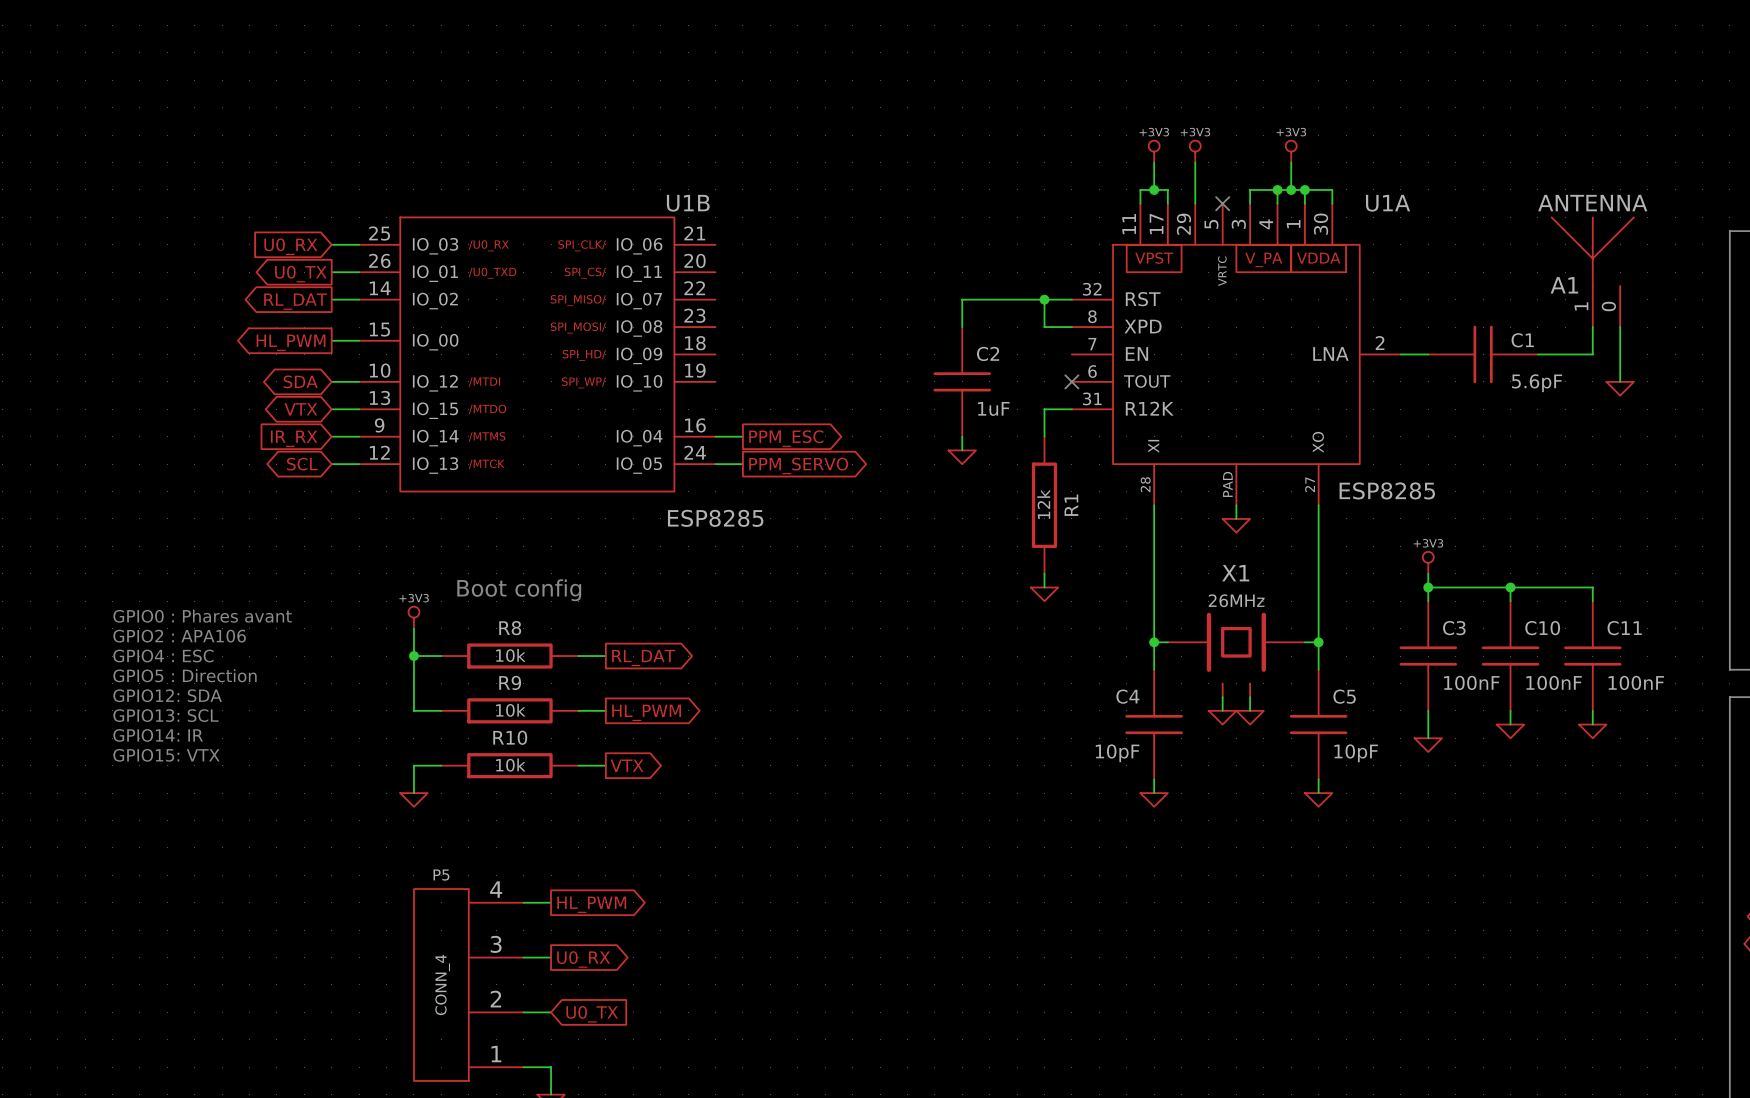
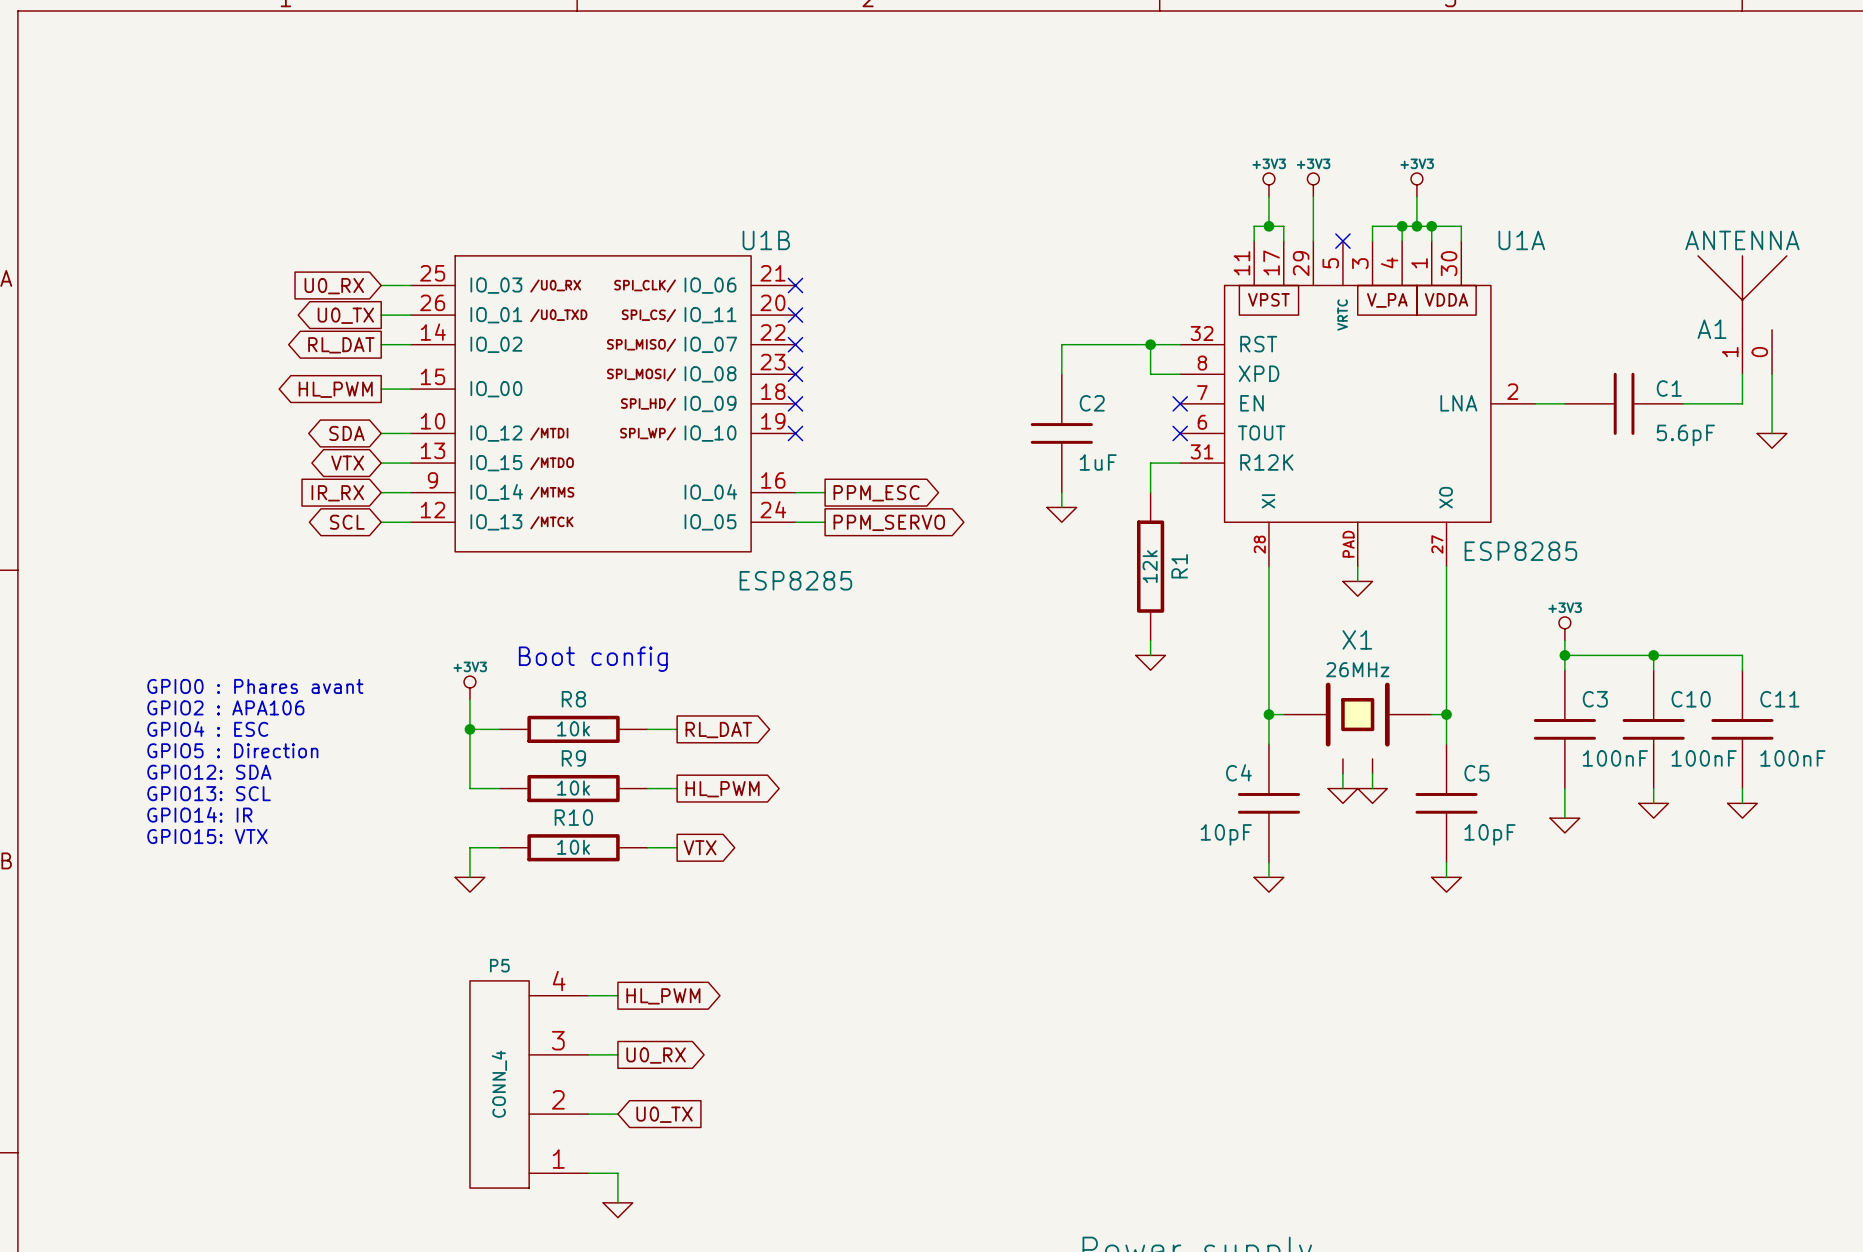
no-connect mark: none -> (795, 285)
no-connect mark: none -> (795, 315)
no-connect mark: none -> (795, 344)
no-connect mark: none -> (795, 374)
no-connect mark: none -> (795, 403)
no-connect mark: none -> (1180, 403)
no-connect mark: none -> (795, 433)

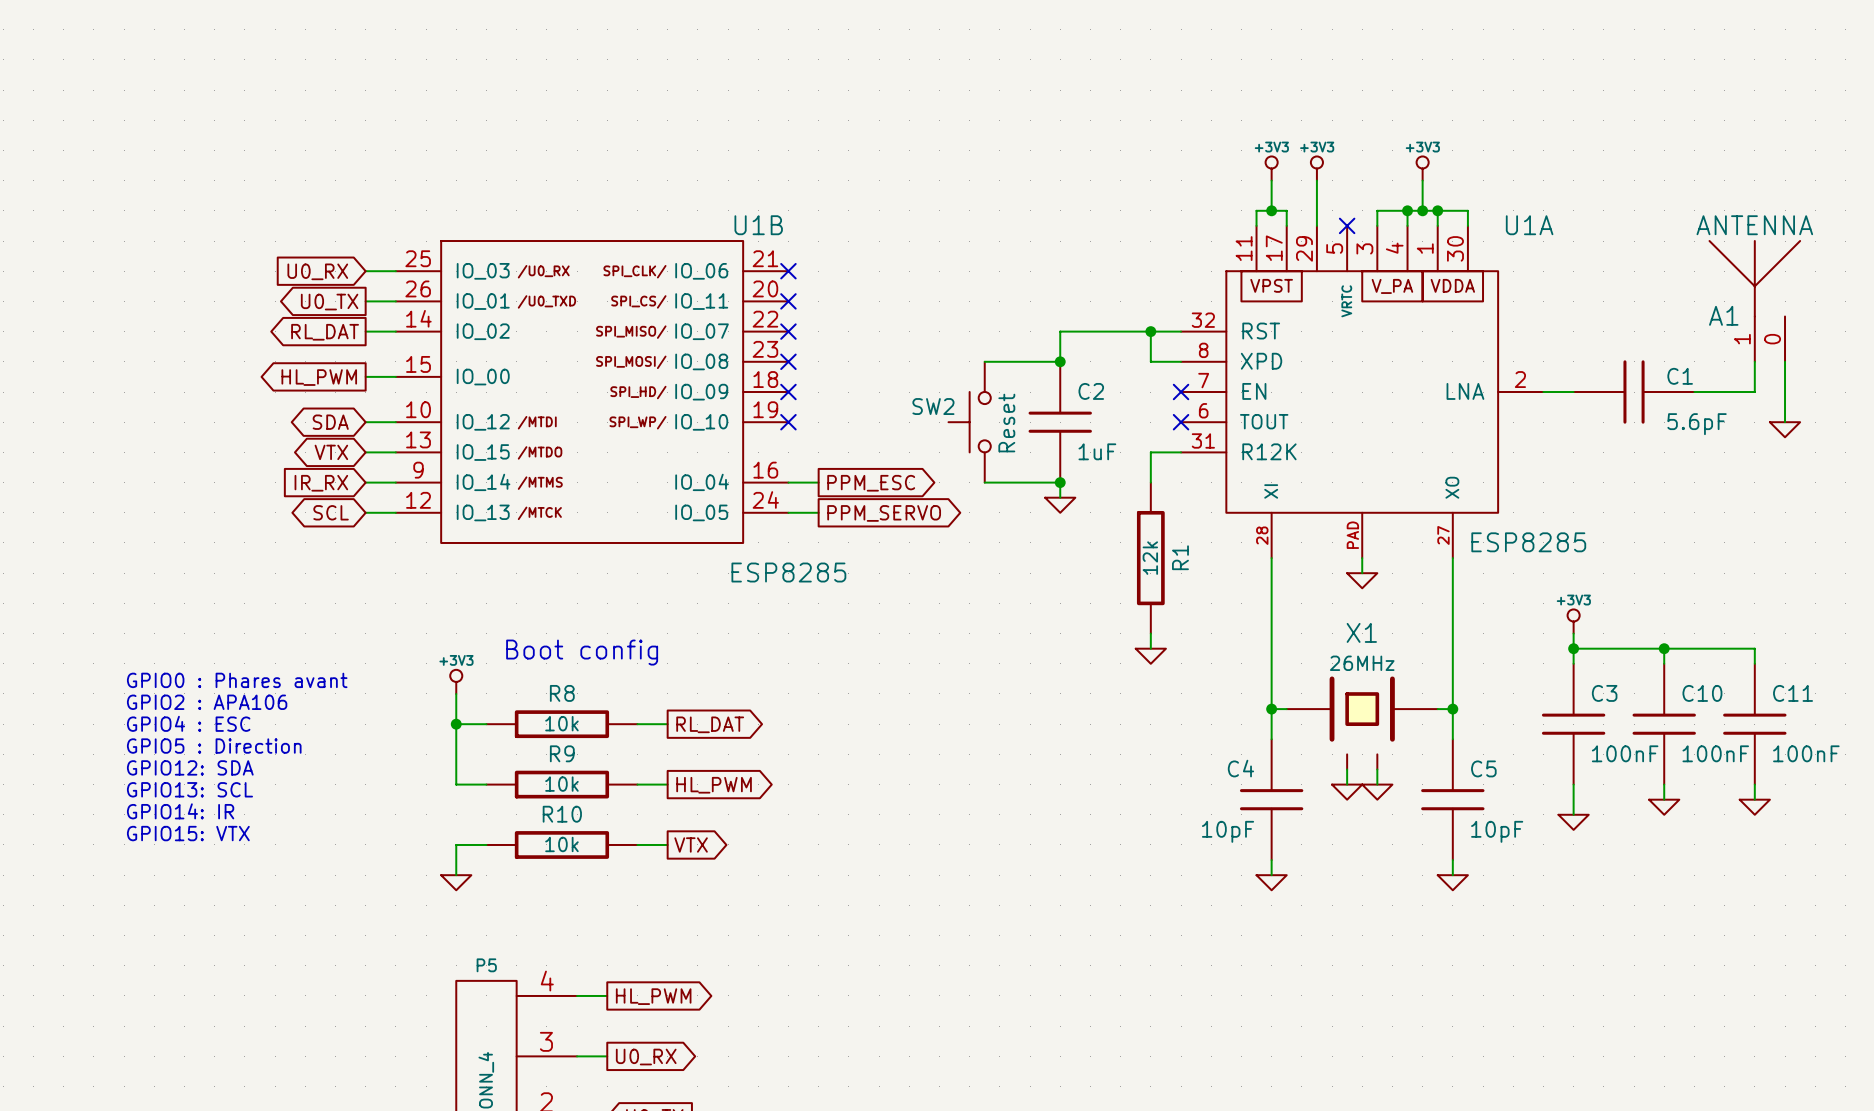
wire: none -> (984, 361) (1060, 361)
junction: none -> (1060, 361)
SW2: none -> Reset (969, 422)
wire: none -> (984, 482) (1060, 482)
junction: none -> (1060, 482)

